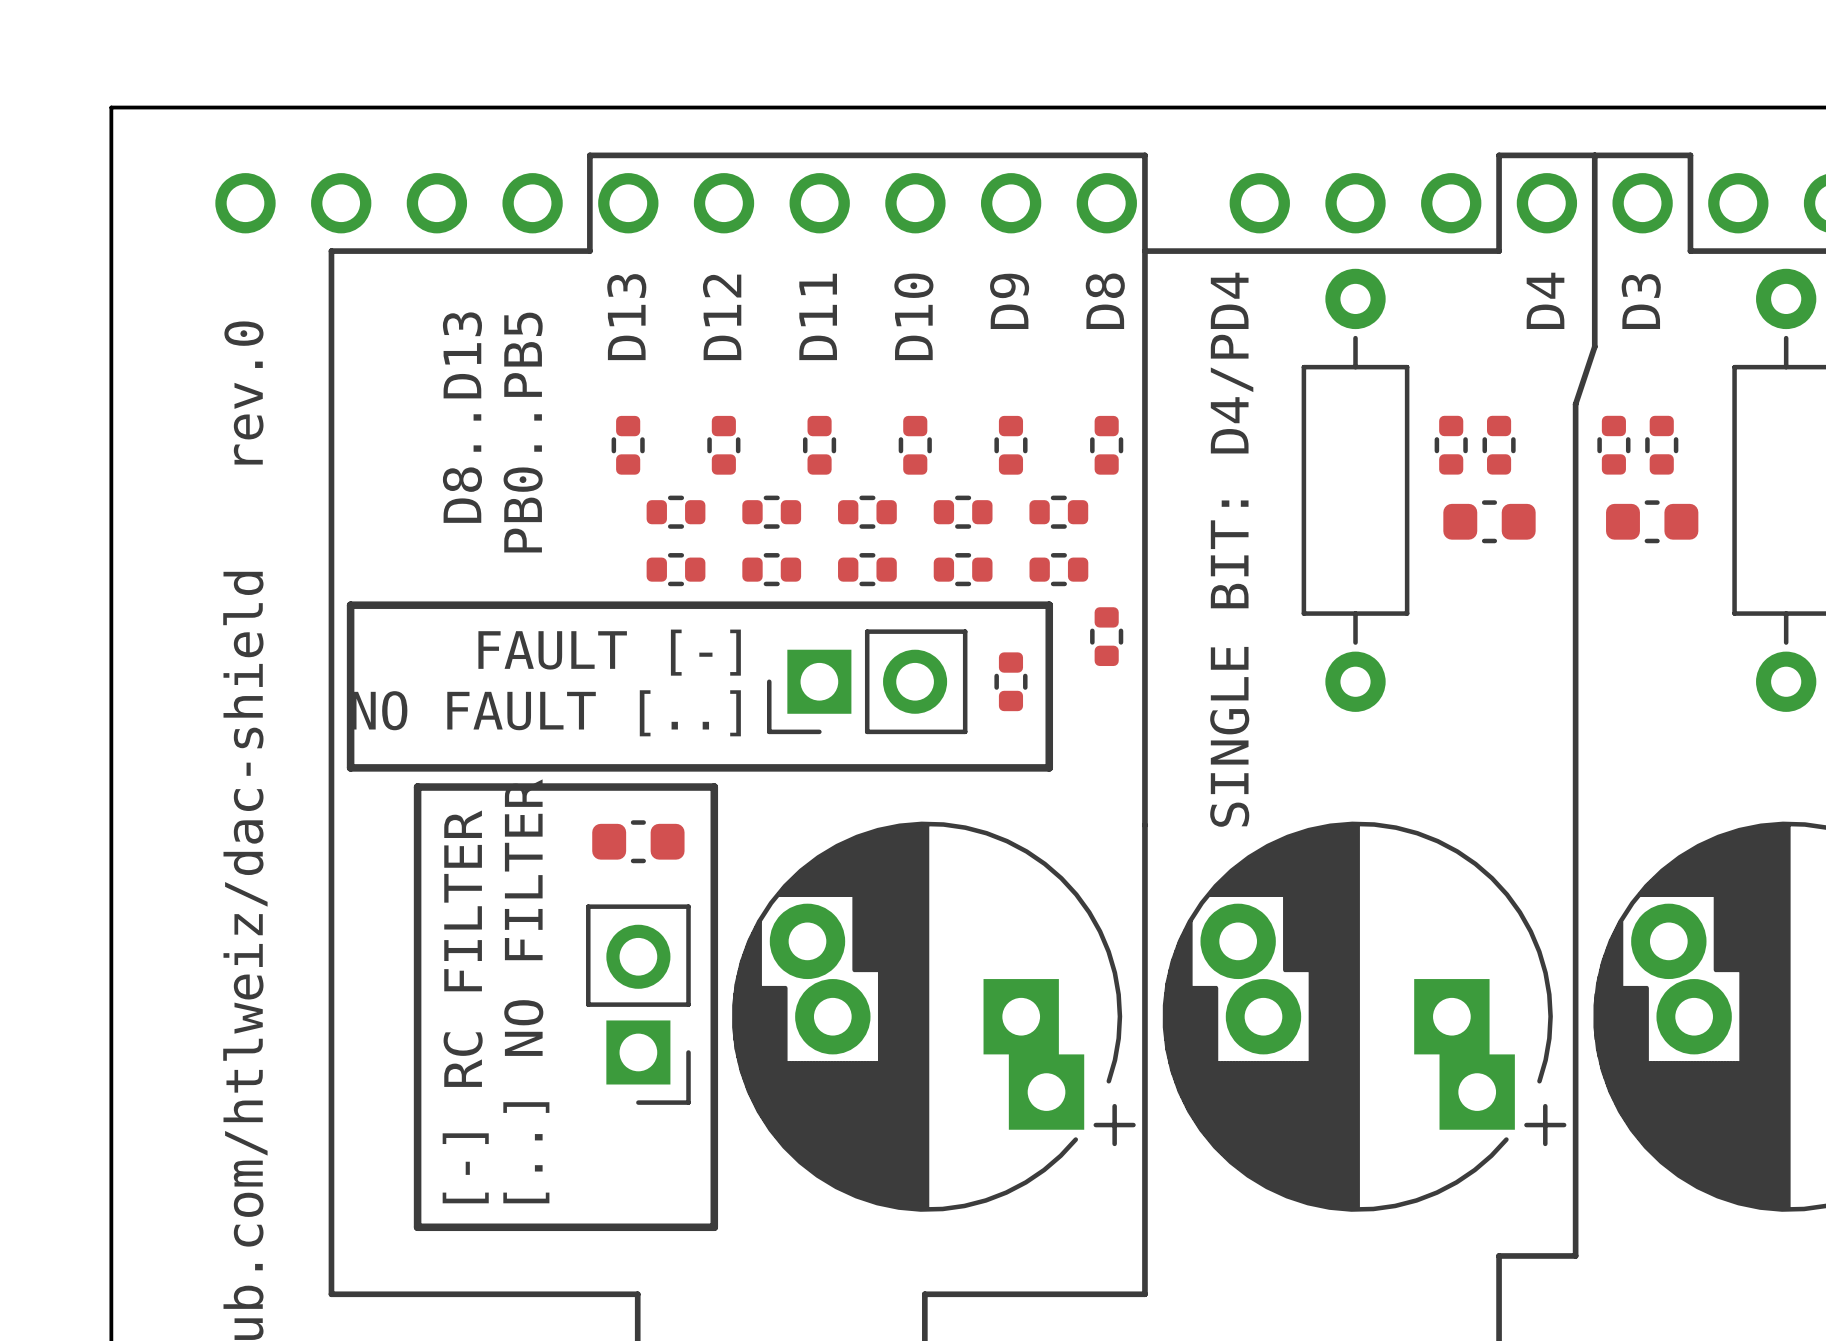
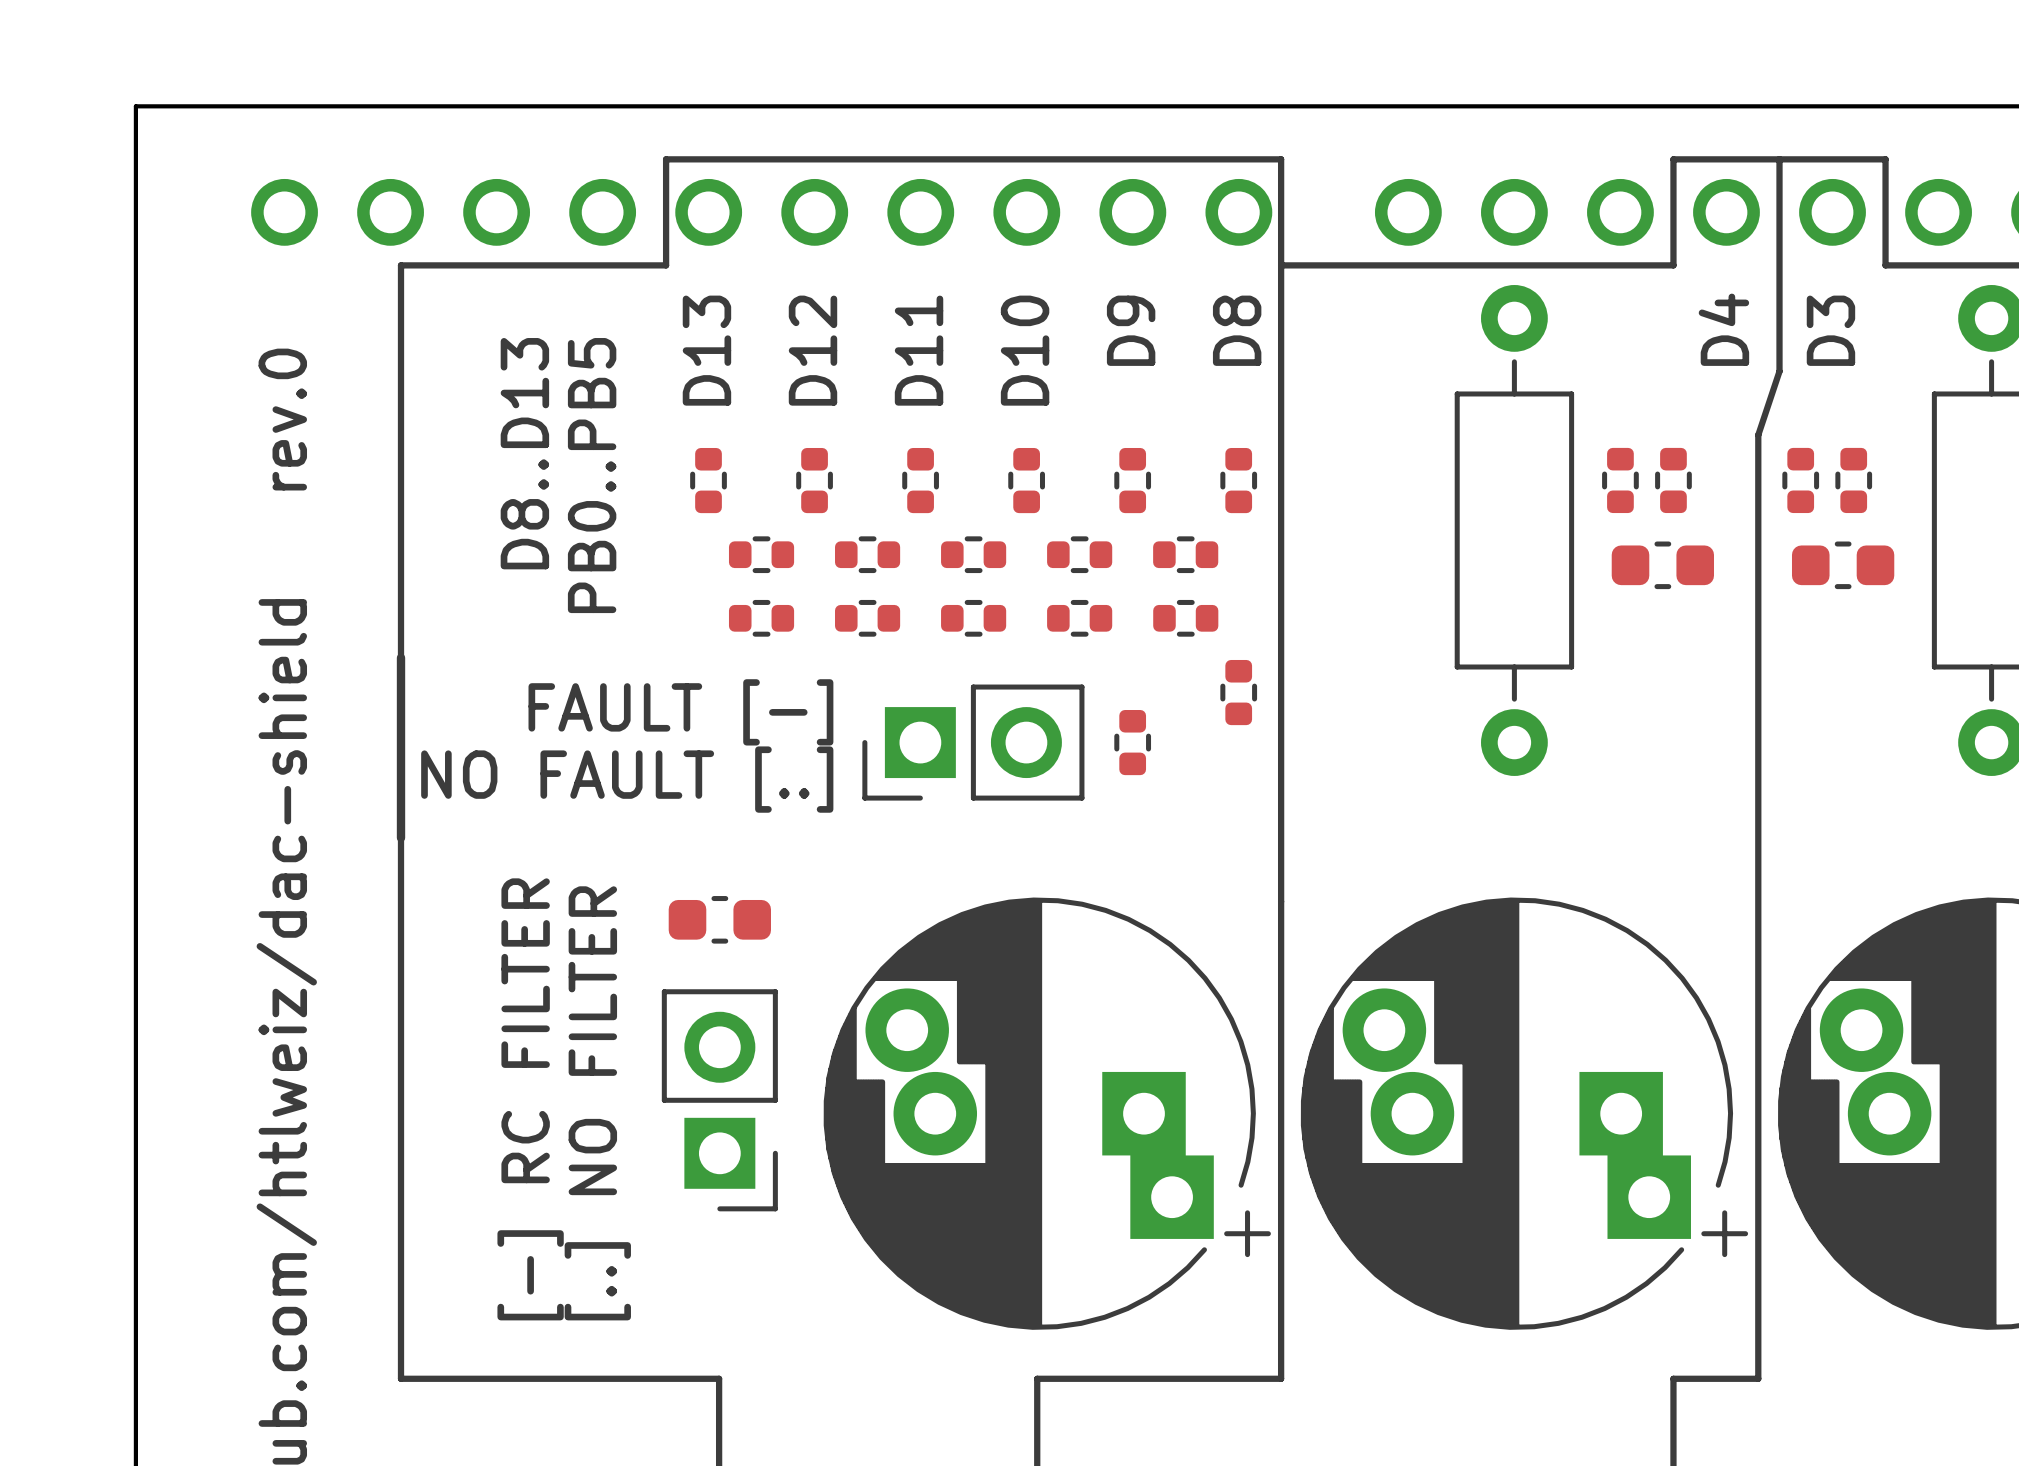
line: (350, 251) (331, 251) (331, 1294) (637, 1294) -> (401, 837) (401, 1378) (719, 1378) (719, 1421)
text: SINGLE BIT: D4/PD4 (1231, 549) -> none
line: (350, 605) (1049, 605) (1049, 767) (350, 767) -> (401, 657) (401, 265)
line: (417, 787) (714, 787) (714, 1227) (417, 1227) (417, 787) -> none
line: (1144, 1255) (1144, 1294) (924, 1294) -> (1281, 1378) (1037, 1378) (1037, 1421)

